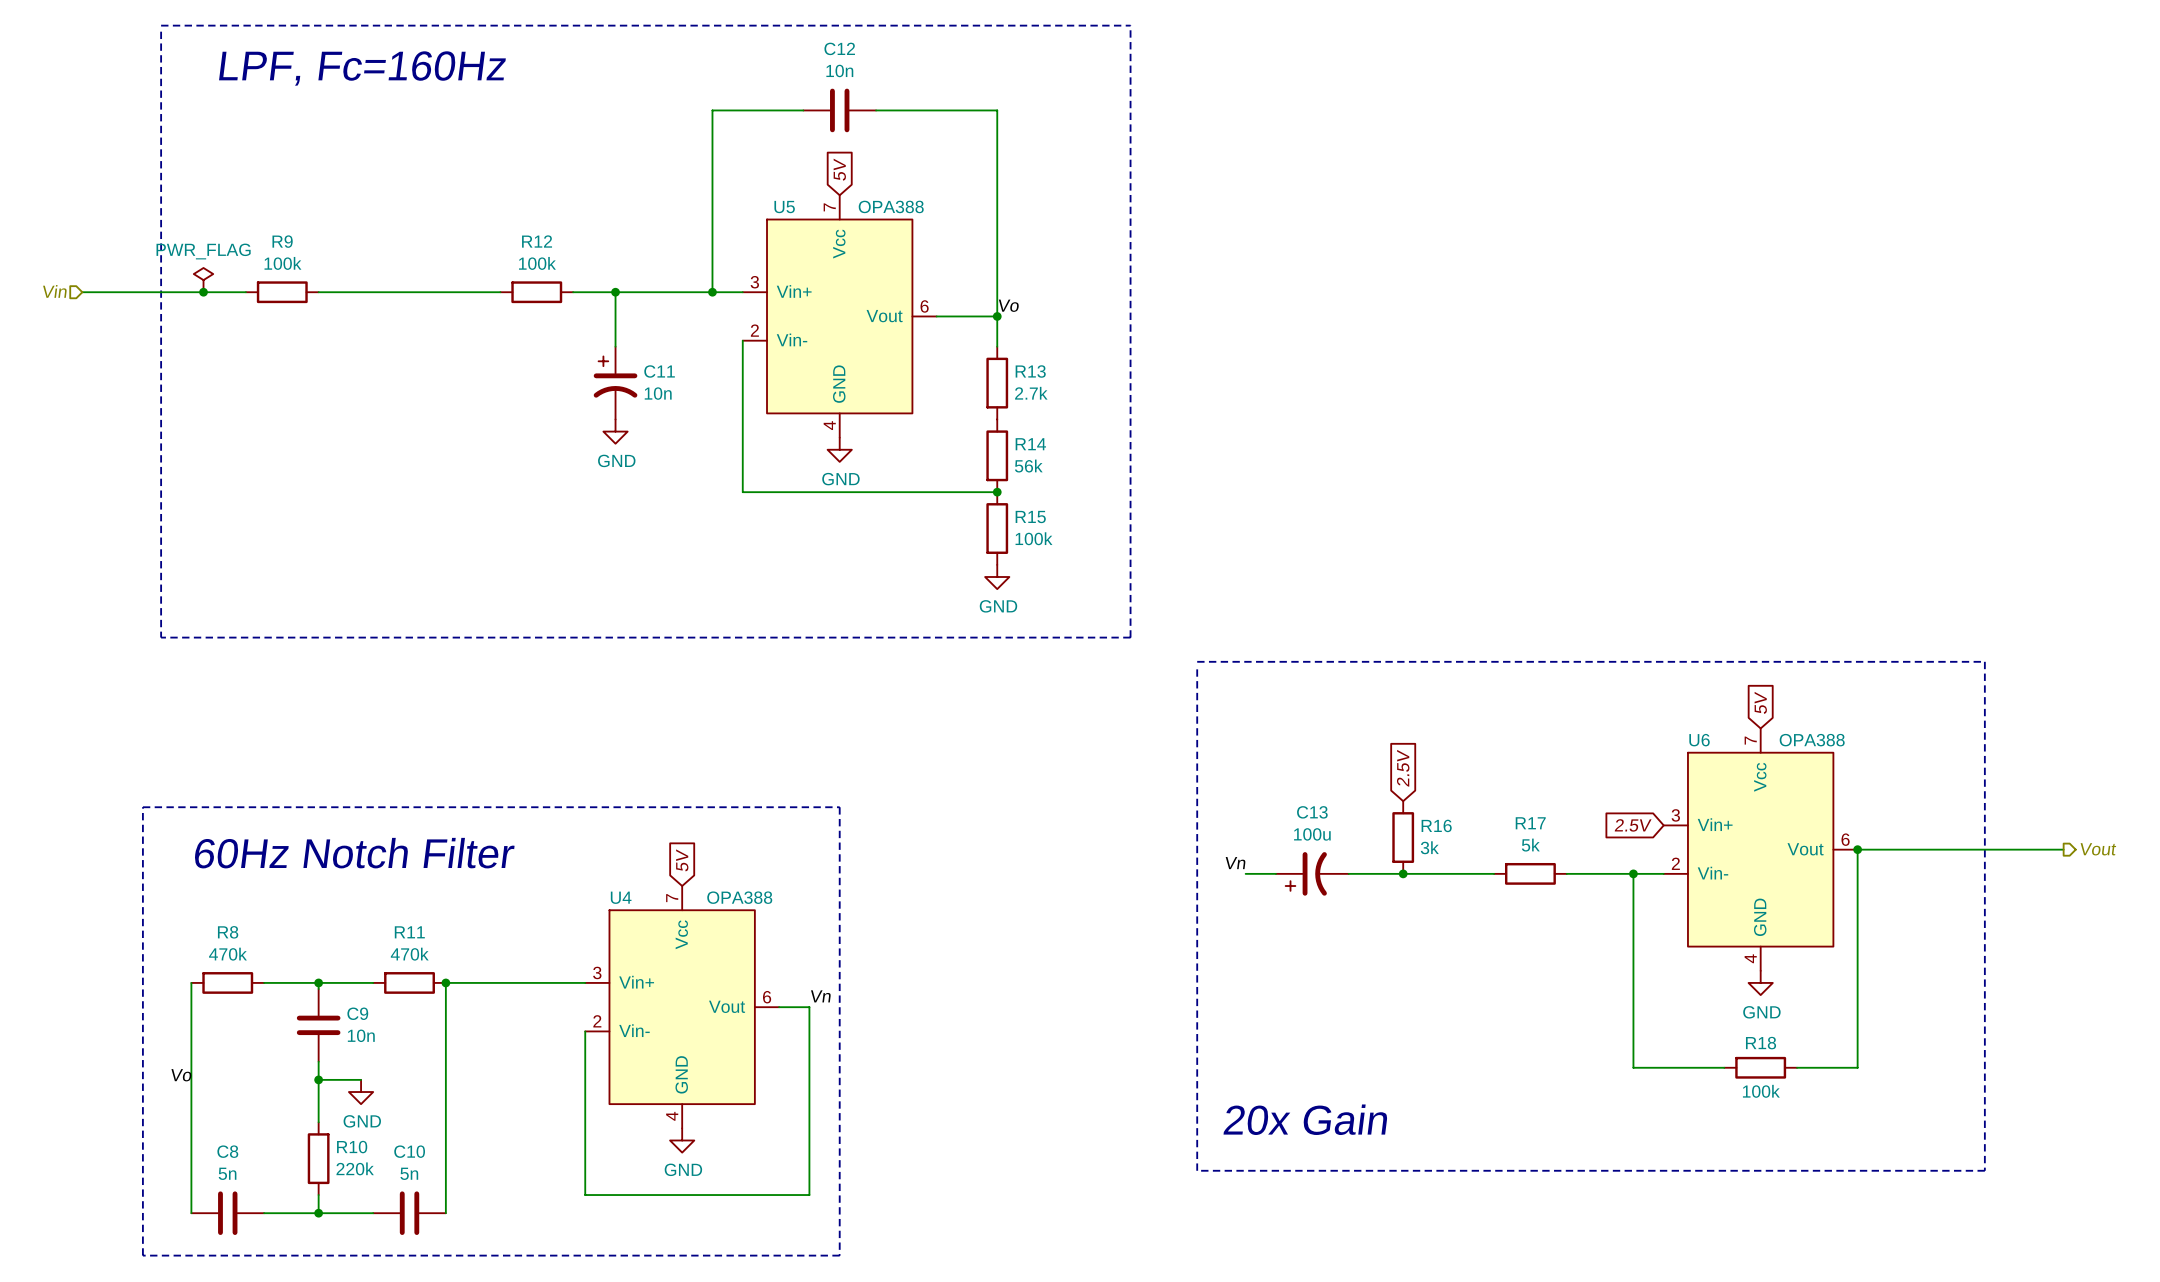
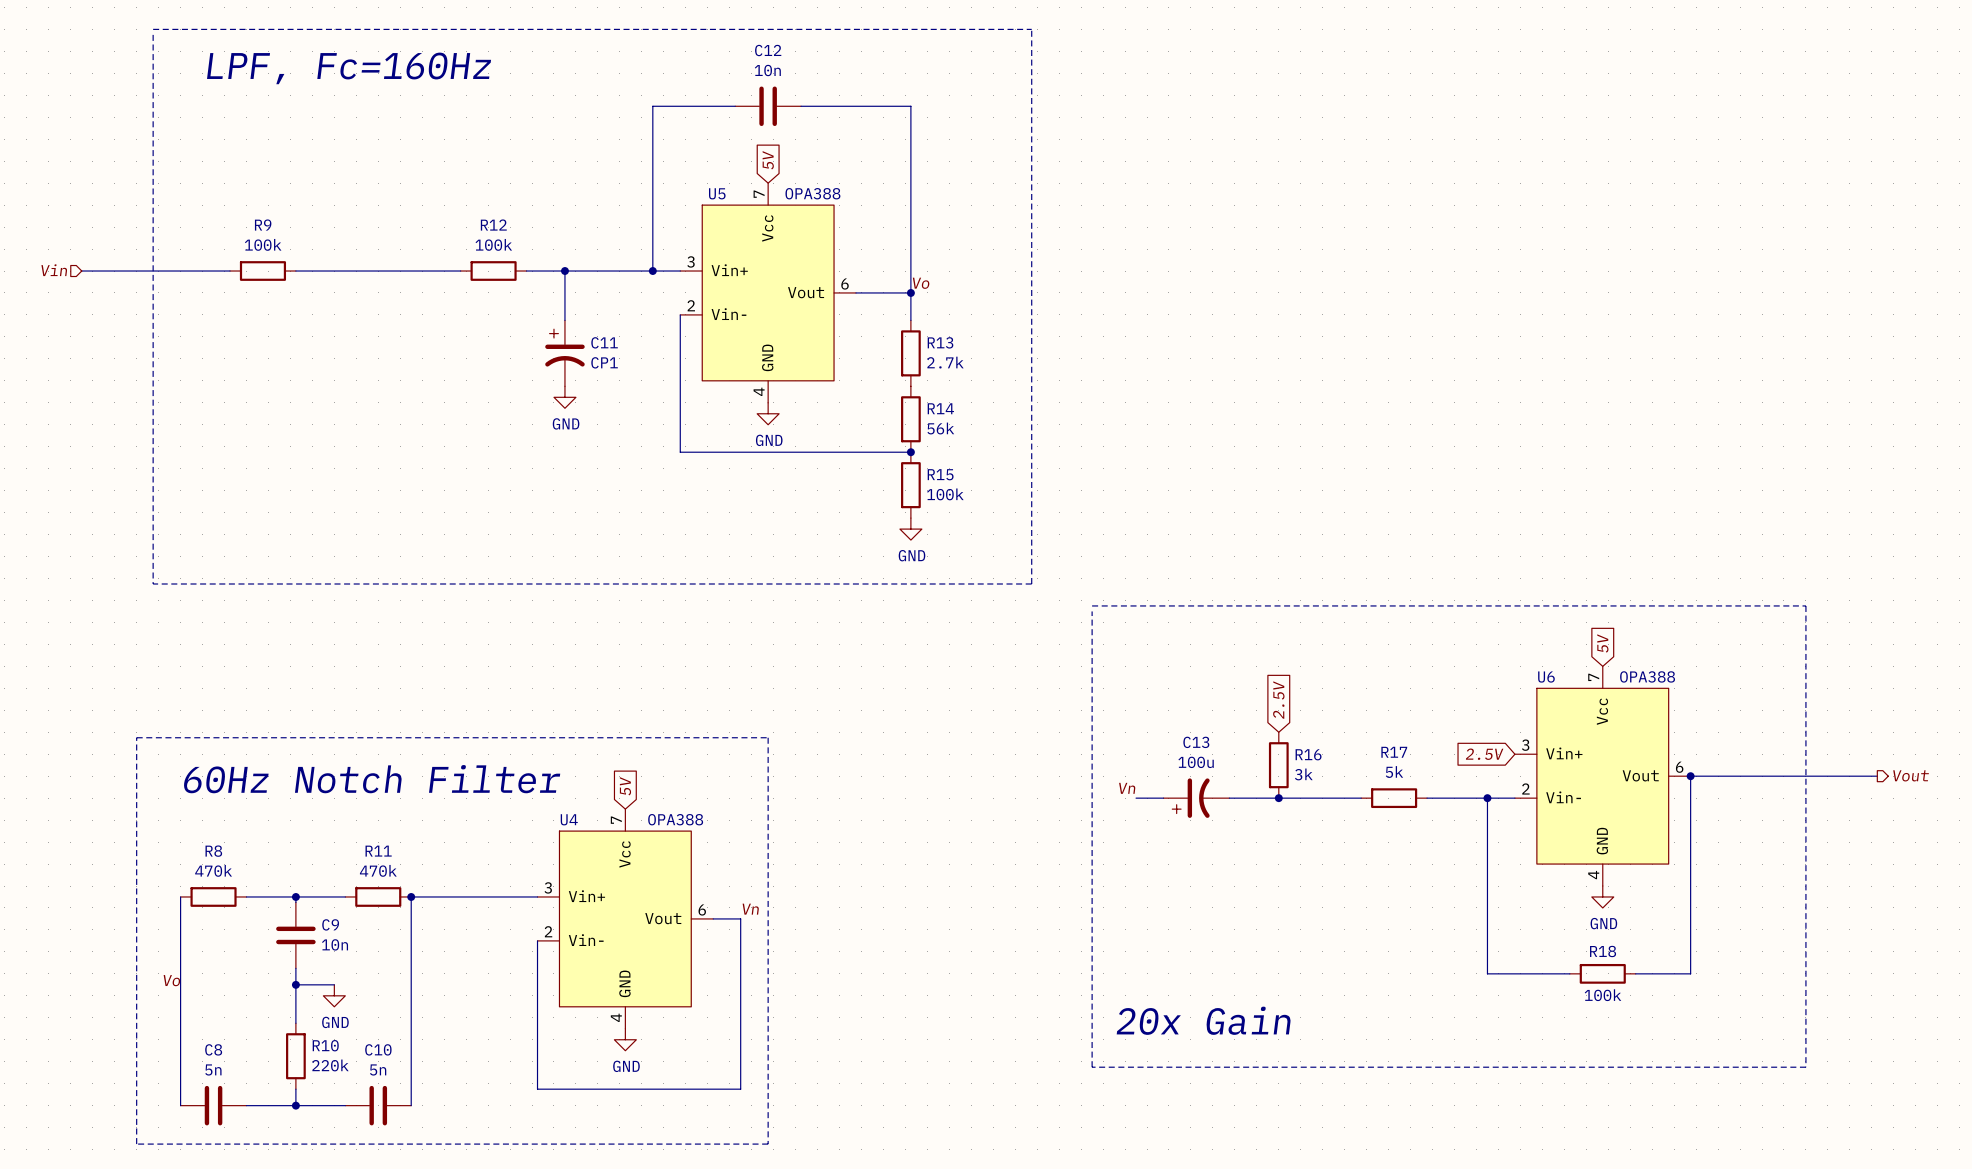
power symbol: PWR_FLAG (203, 280) -> none
junction: (203, 292) -> none
C11 value: 10n (658, 393) -> CP1 (604, 362)

